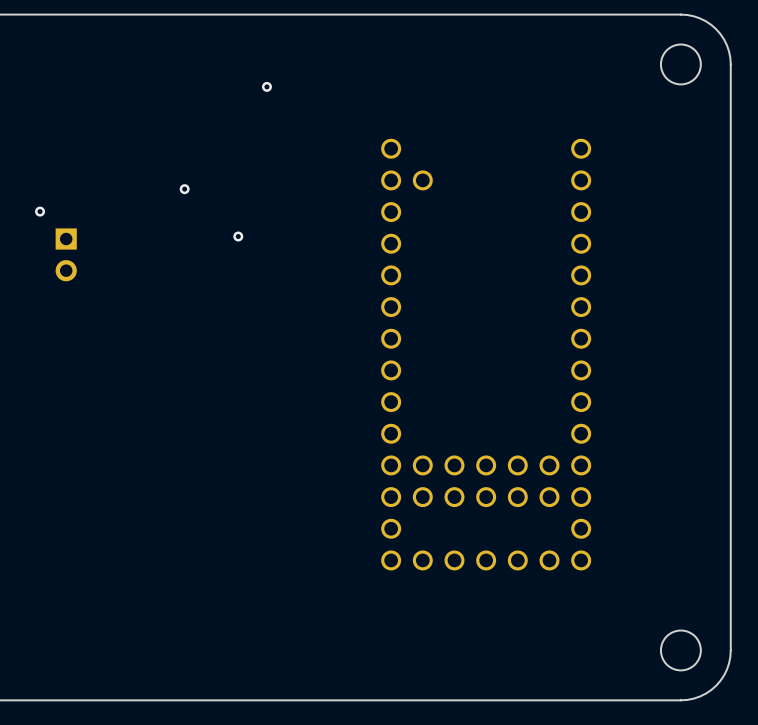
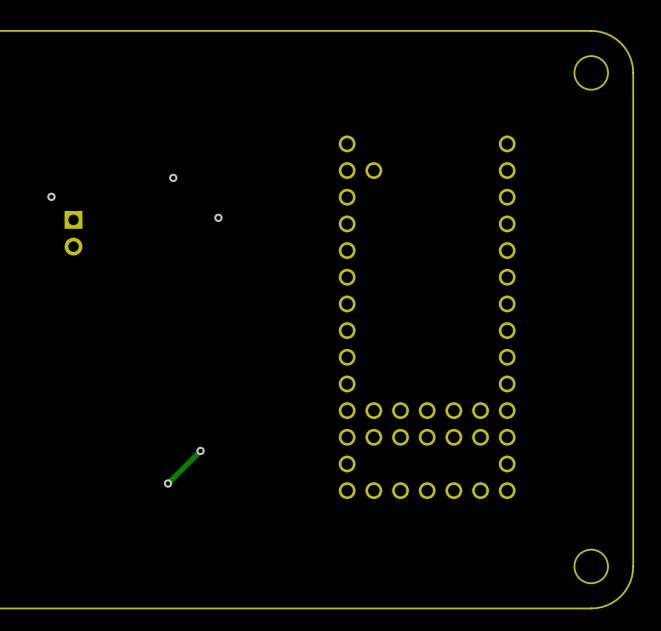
via: (266, 86) -> none
track: none -> (200, 450) (168, 483)
via: none -> (200, 450)
via: none -> (168, 483)

